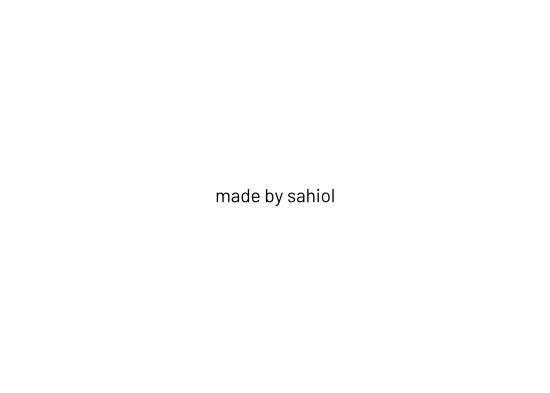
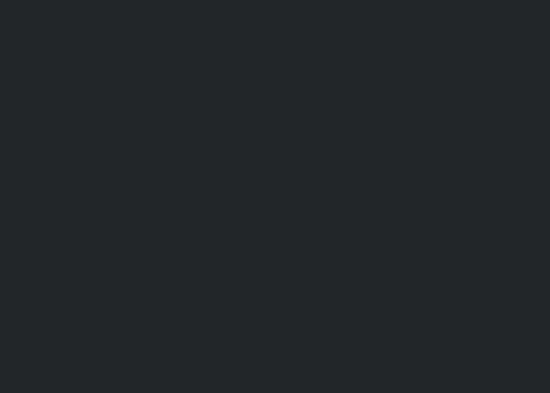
text: made by sahiol (275, 197) -> none

